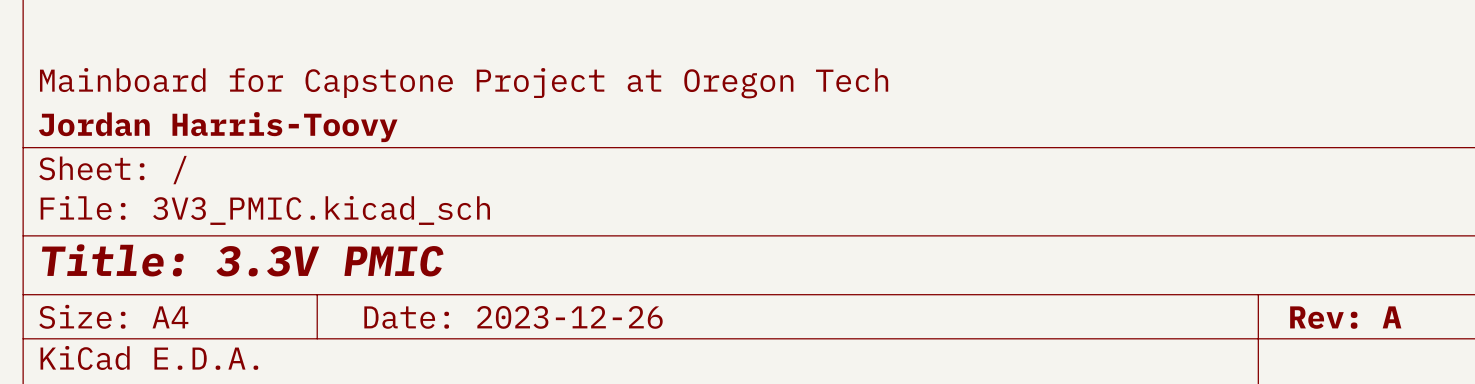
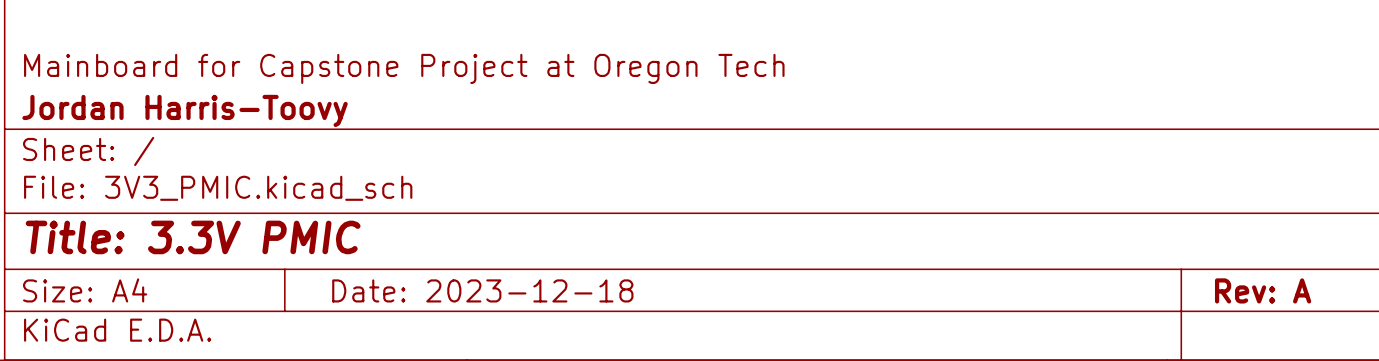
title block: Date: 2023-12-26 (513, 317) -> Date: 2023-12-18 (482, 290)

